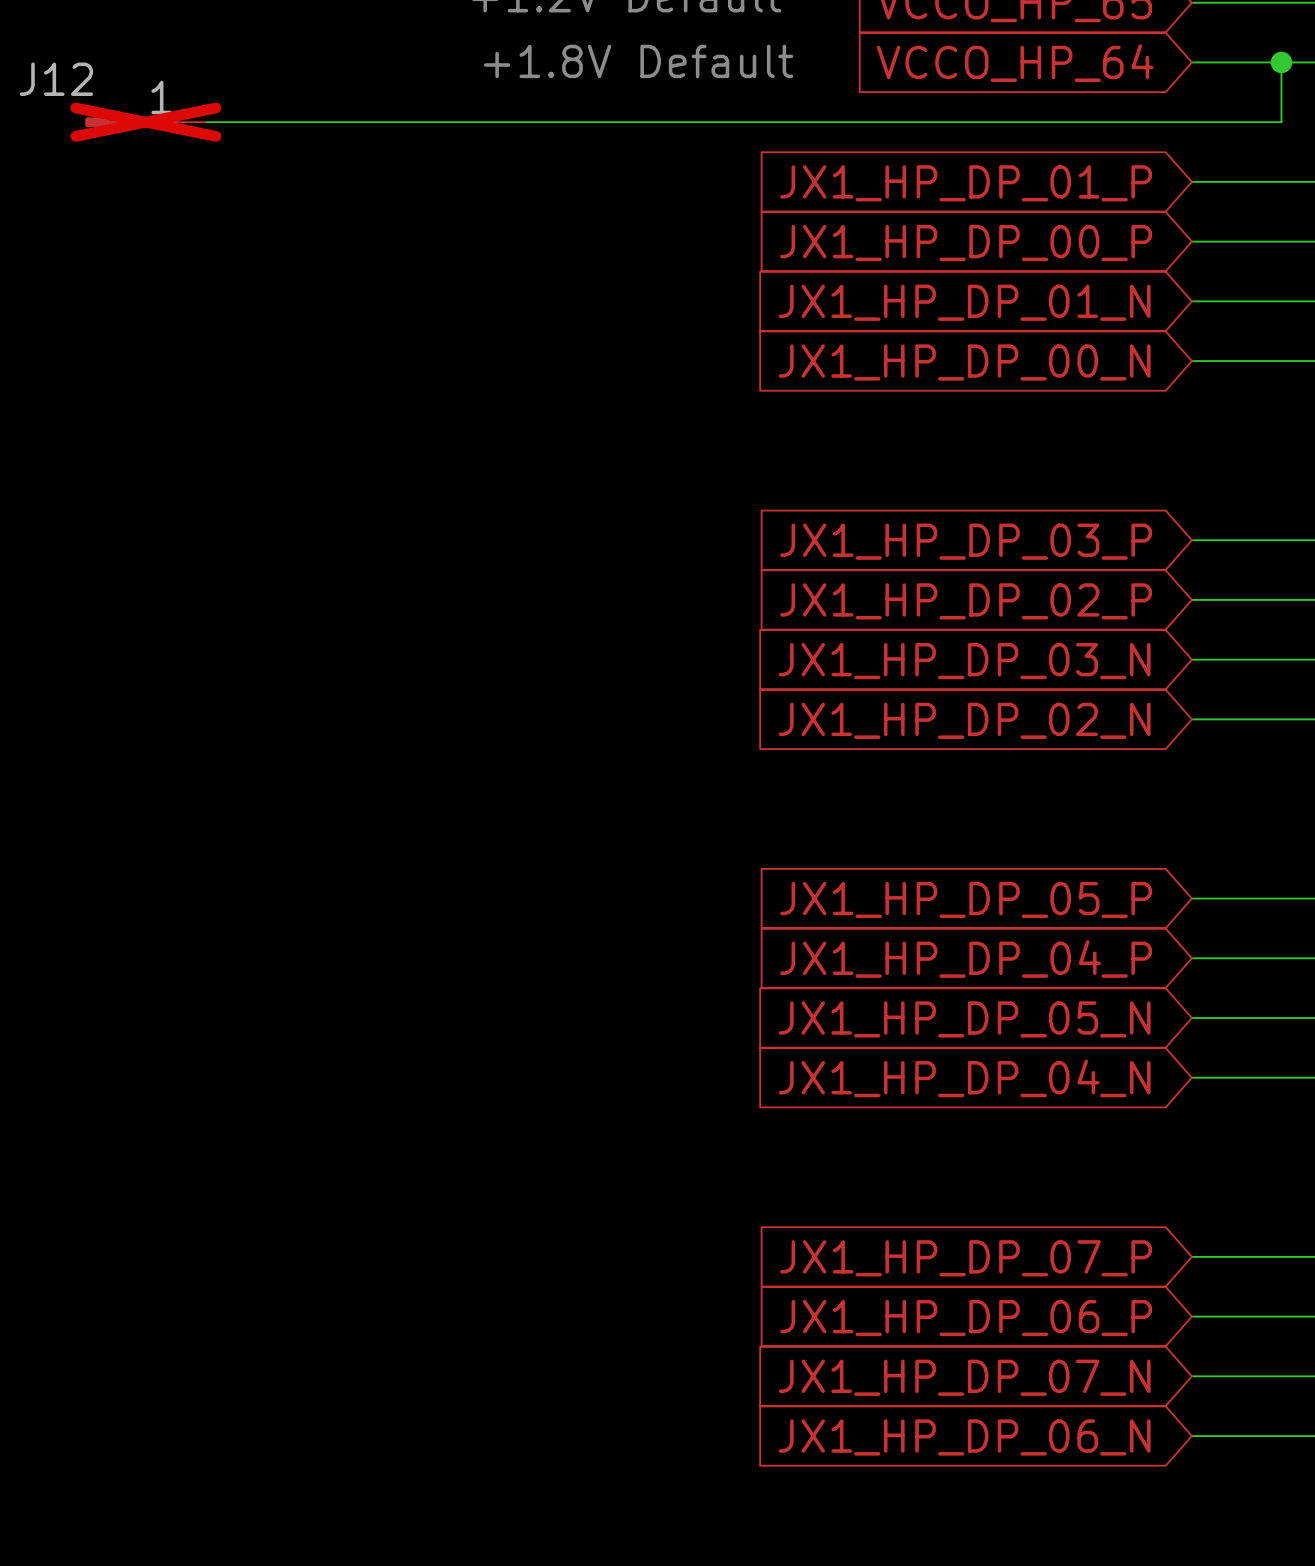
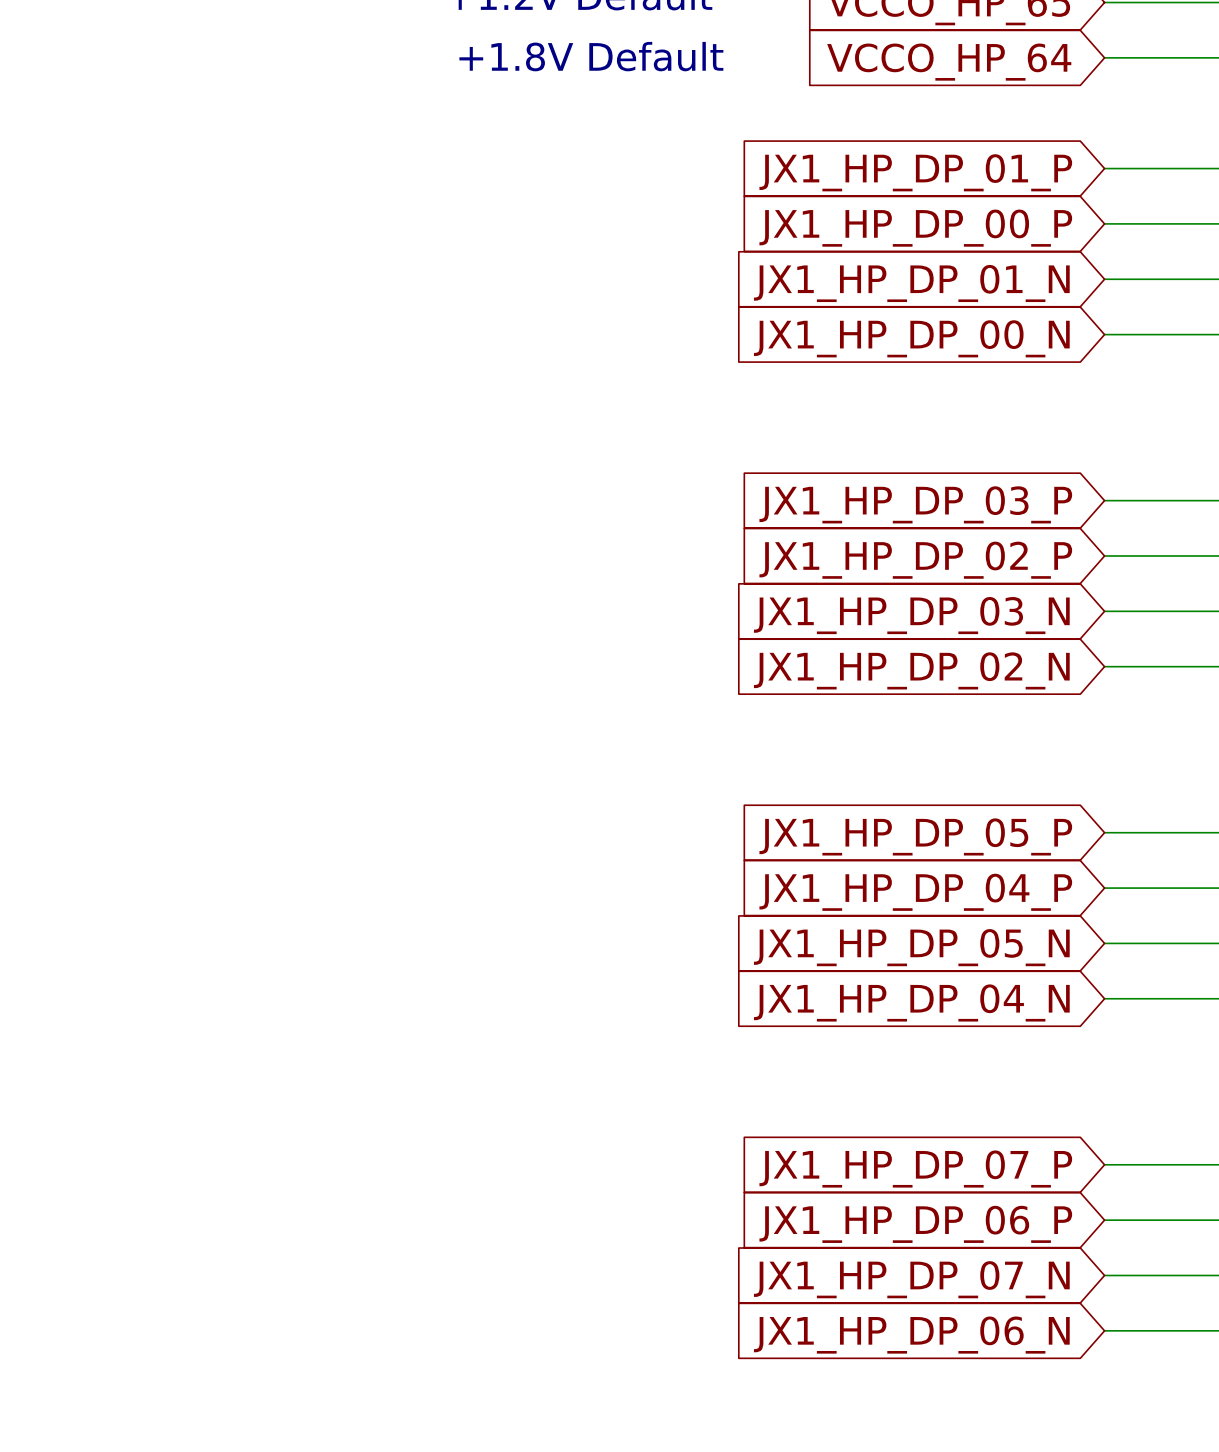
wire: (1281, 62) (1281, 122) (206, 122) -> none
junction: (1281, 62) -> none
J12: (145, 122) -> none

